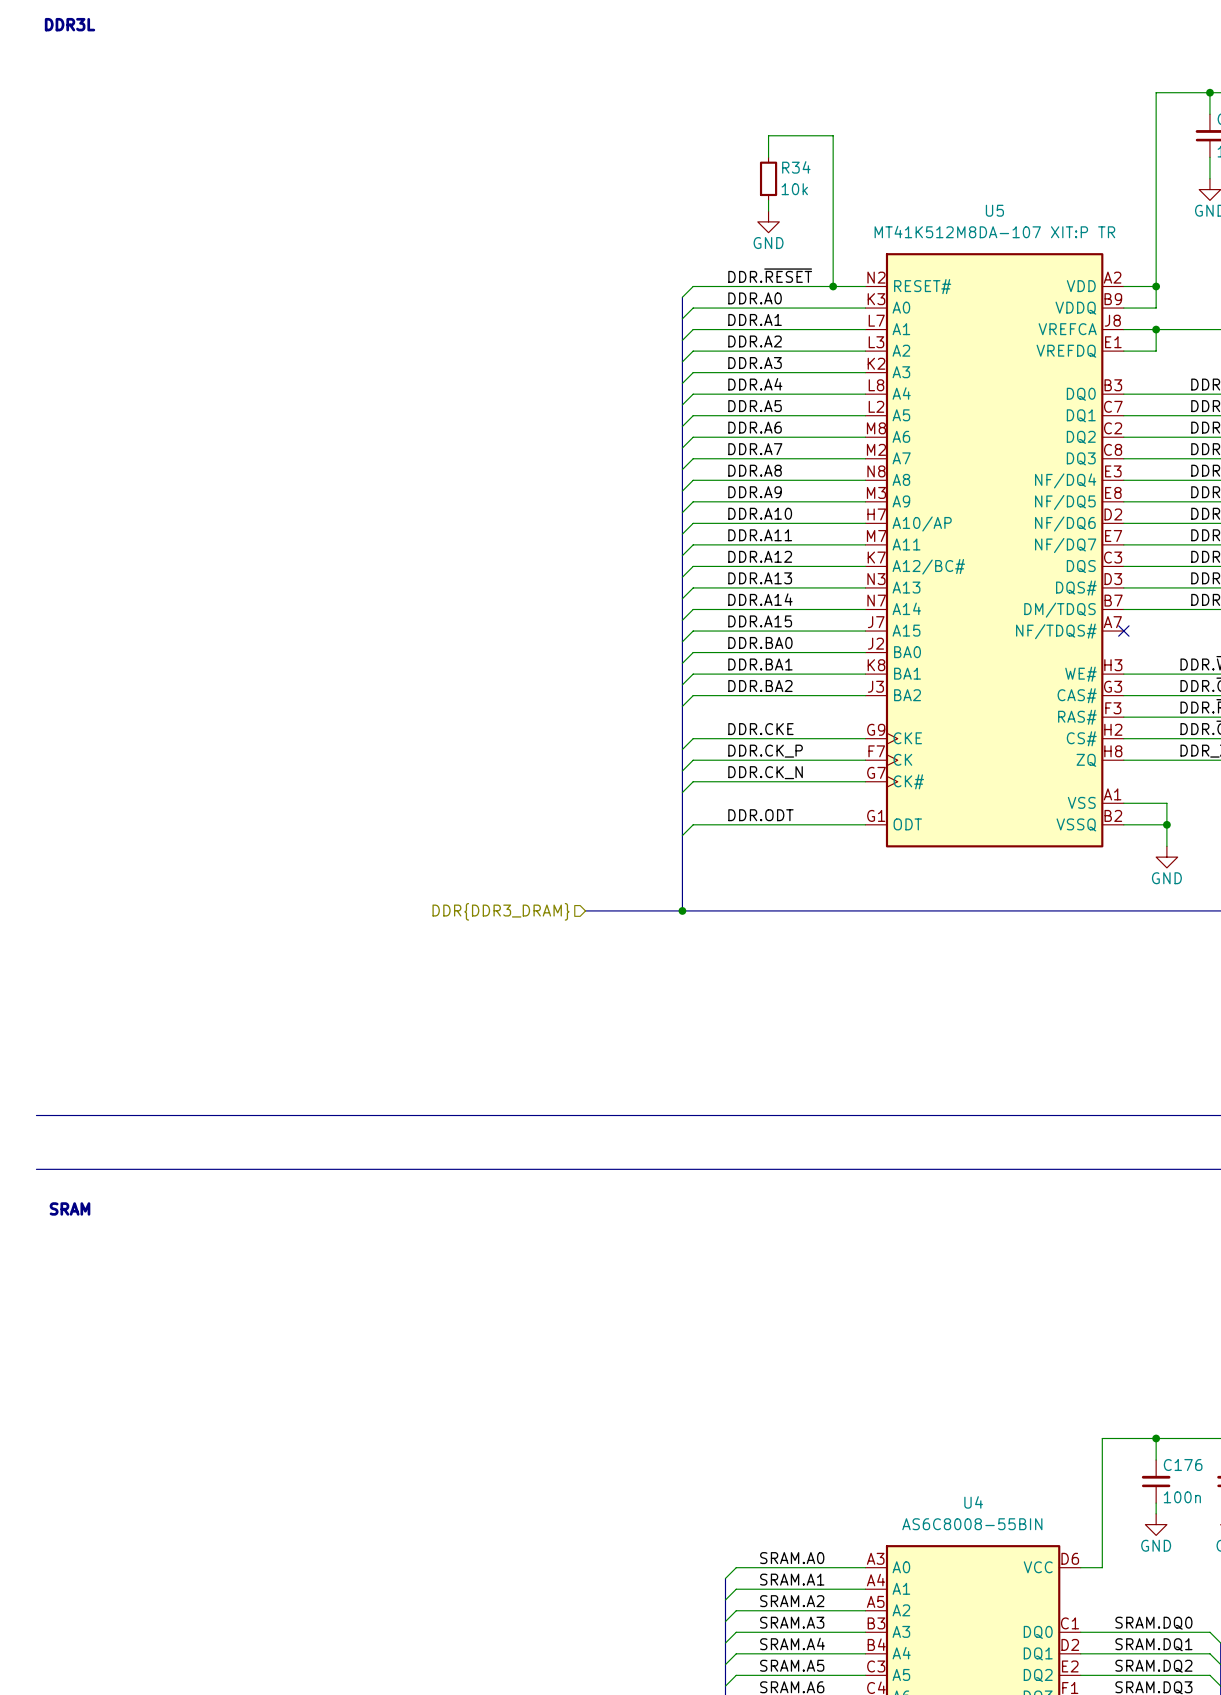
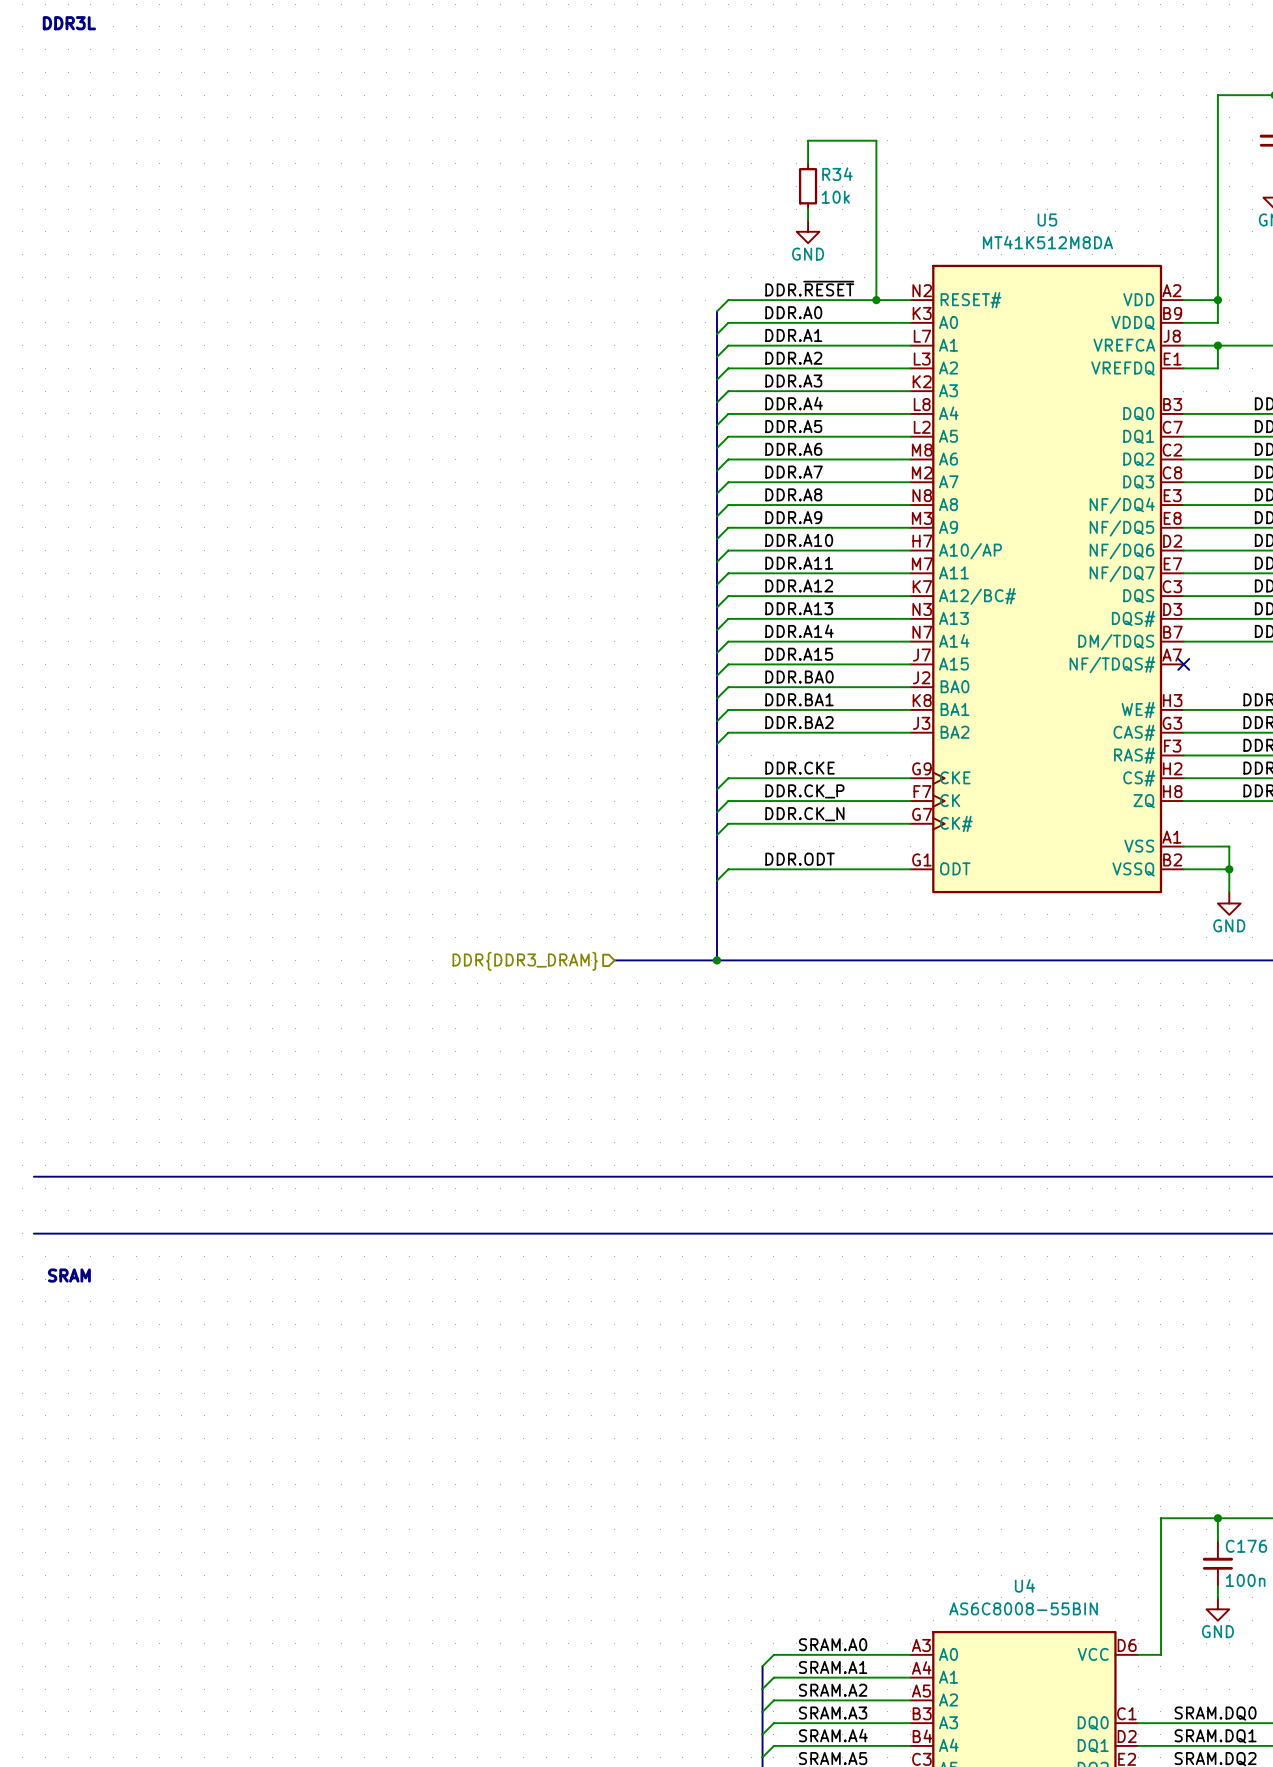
U5 text: MT41K512M8DA-107 XIT:P TR (994, 232) -> none
U5 value: none -> MT41K512M8DA (1047, 242)

